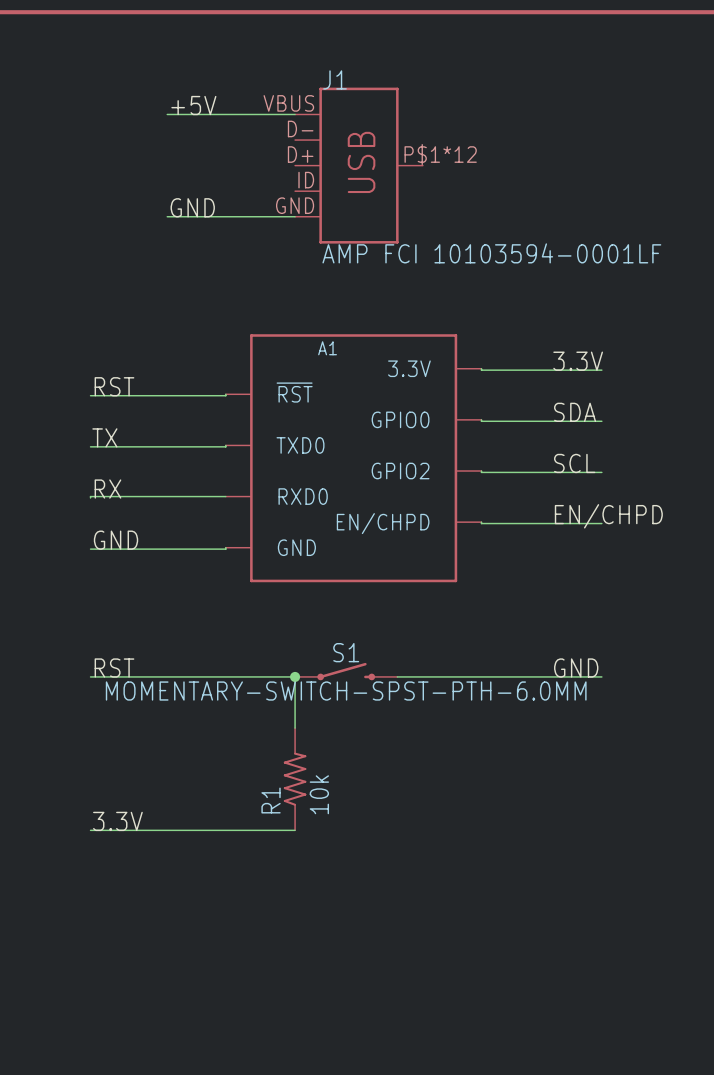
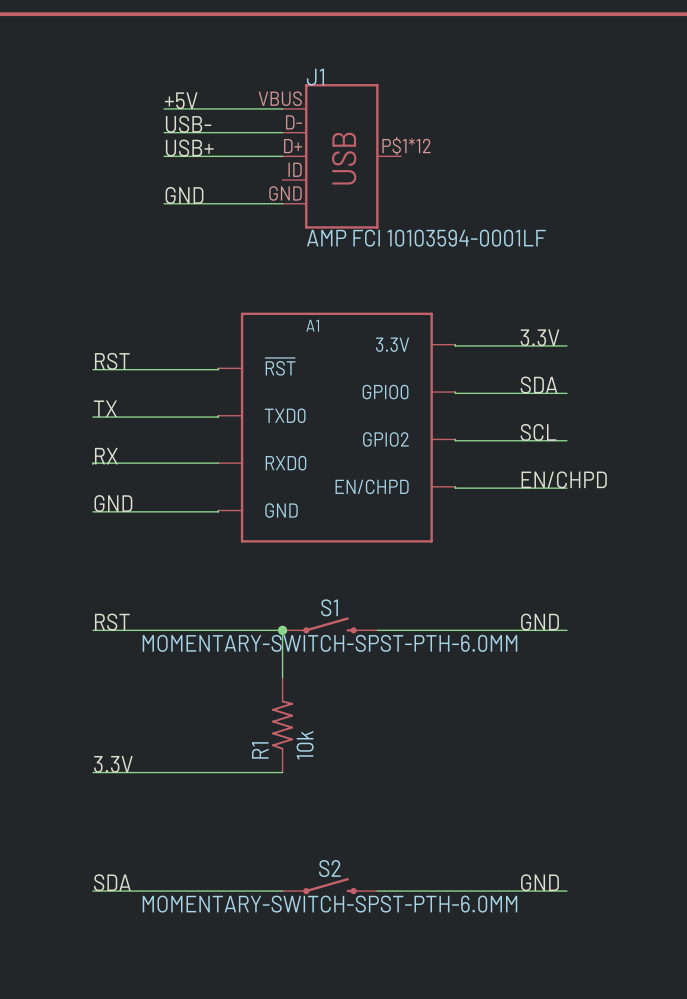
label: none -> USB- (188, 124)
wire: none -> (164, 132) (282, 132)
label: none -> USB+ (189, 148)
wire: none -> (164, 156) (282, 156)
label: none -> SDA (112, 882)
label: none -> GND (540, 882)
S2: none -> MOMENTARY-SWITCH-SPST-PTH-6.0MM (329, 886)
wire: none -> (92, 891) (282, 891)
wire: none -> (377, 891) (566, 891)

